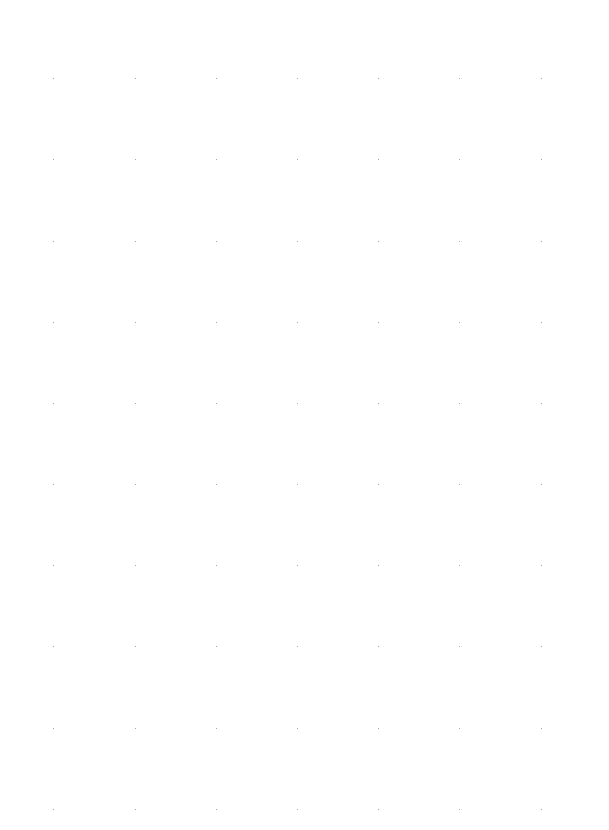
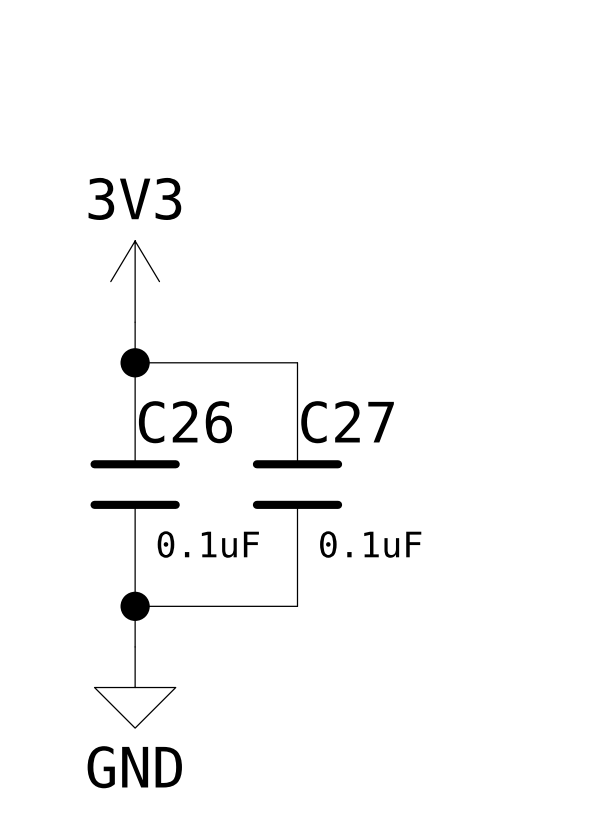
power symbol: none -> 3V3 (135, 281)
wire: none -> (135, 322) (135, 362) (297, 362)
junction: none -> (135, 362)
C26: none -> 0.1uF (135, 484)
C27: none -> 0.1uF (297, 484)
junction: none -> (135, 606)
wire: none -> (297, 606) (135, 606) (135, 646)
power symbol: none -> GND (135, 687)

